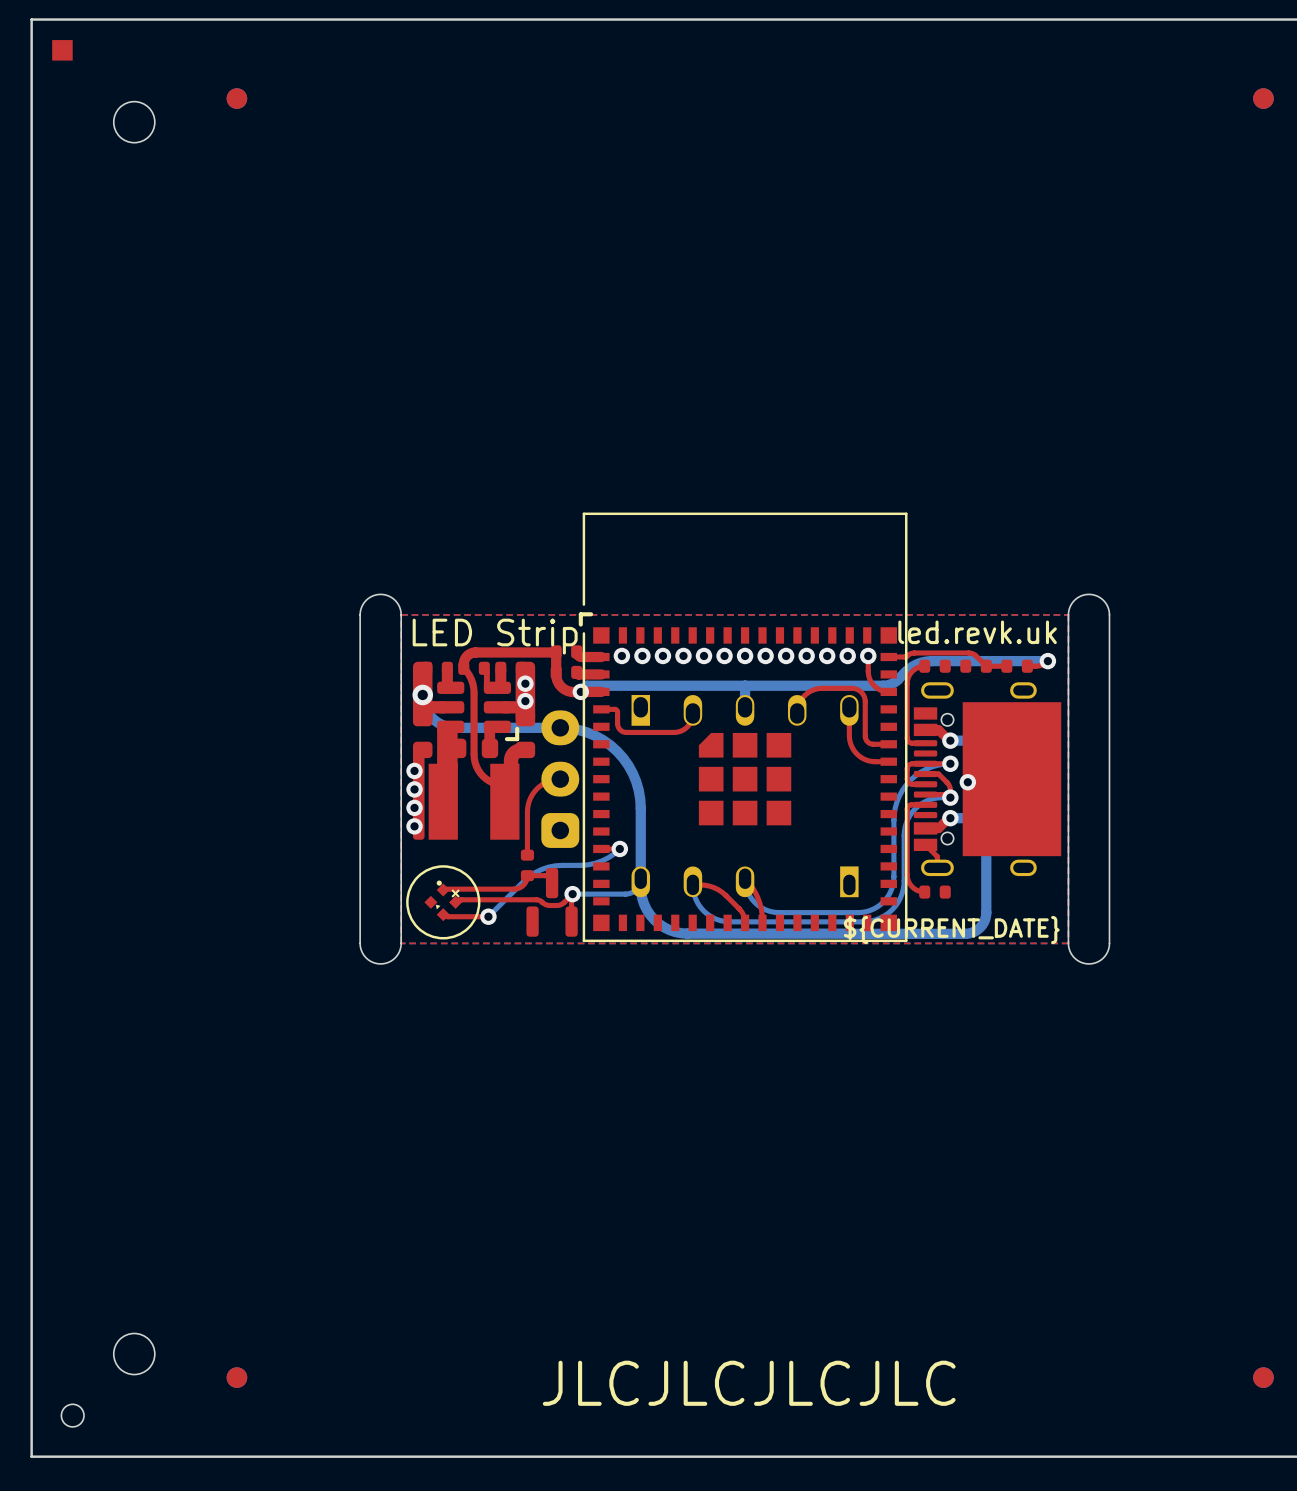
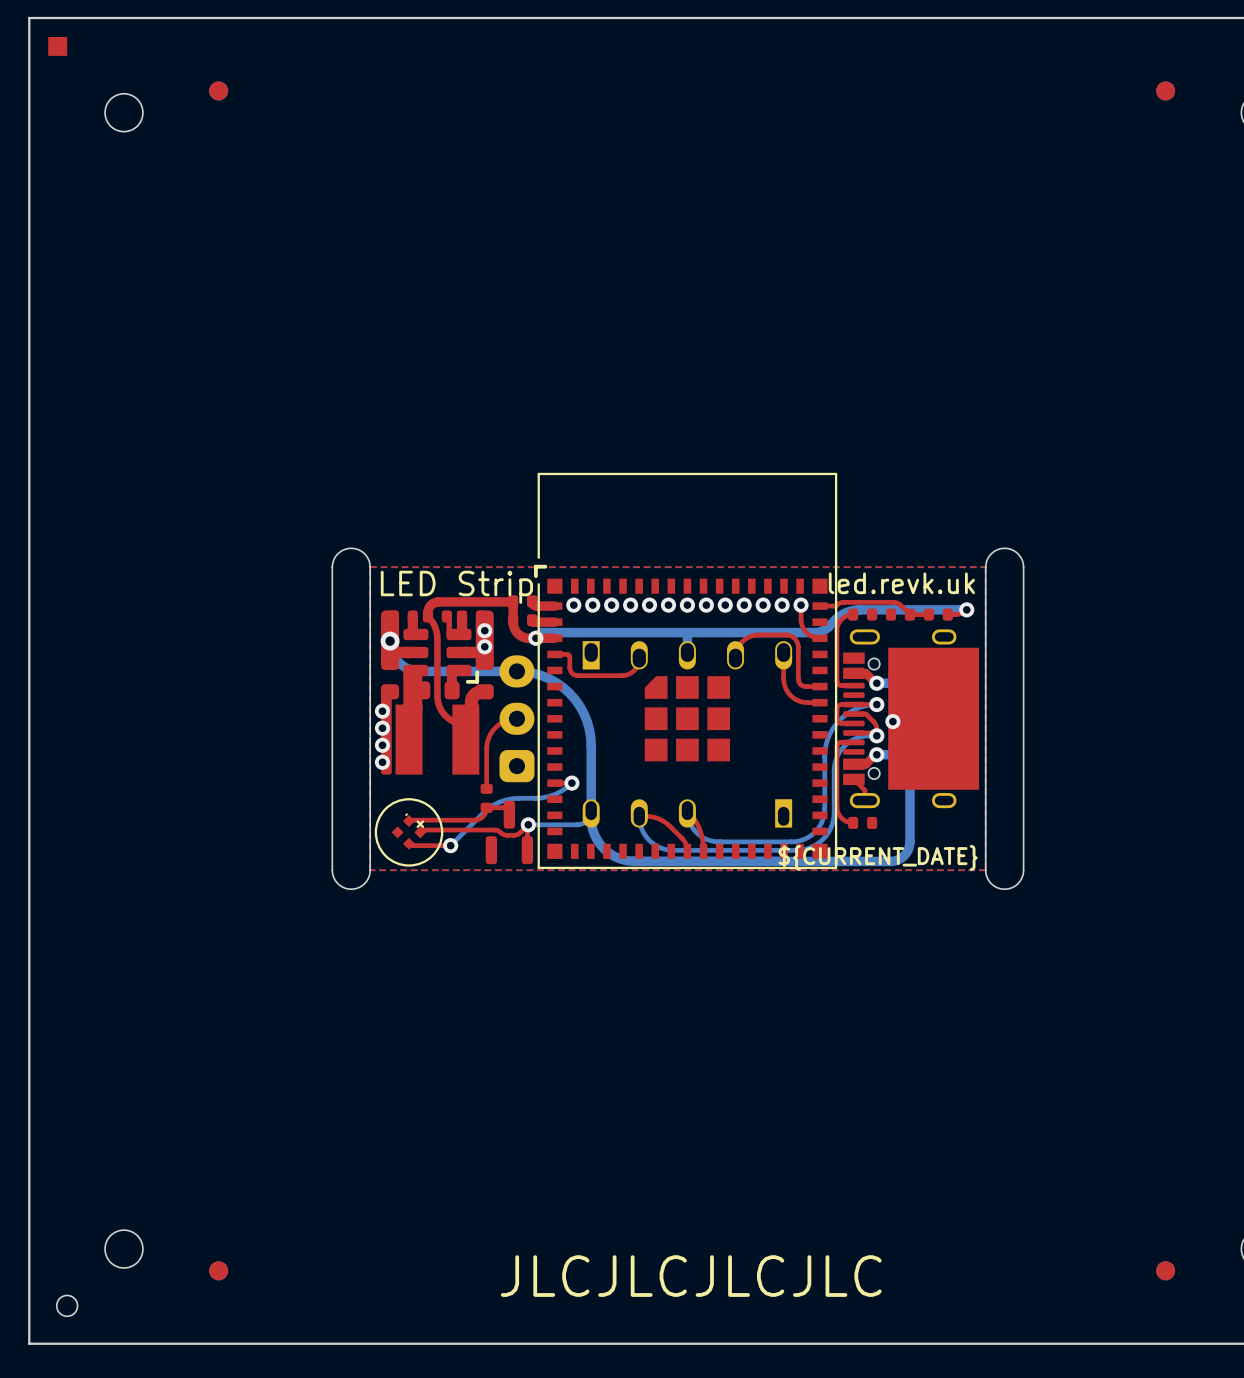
part footprint: [424, 880, 463, 922] -> [391, 813, 427, 850]

